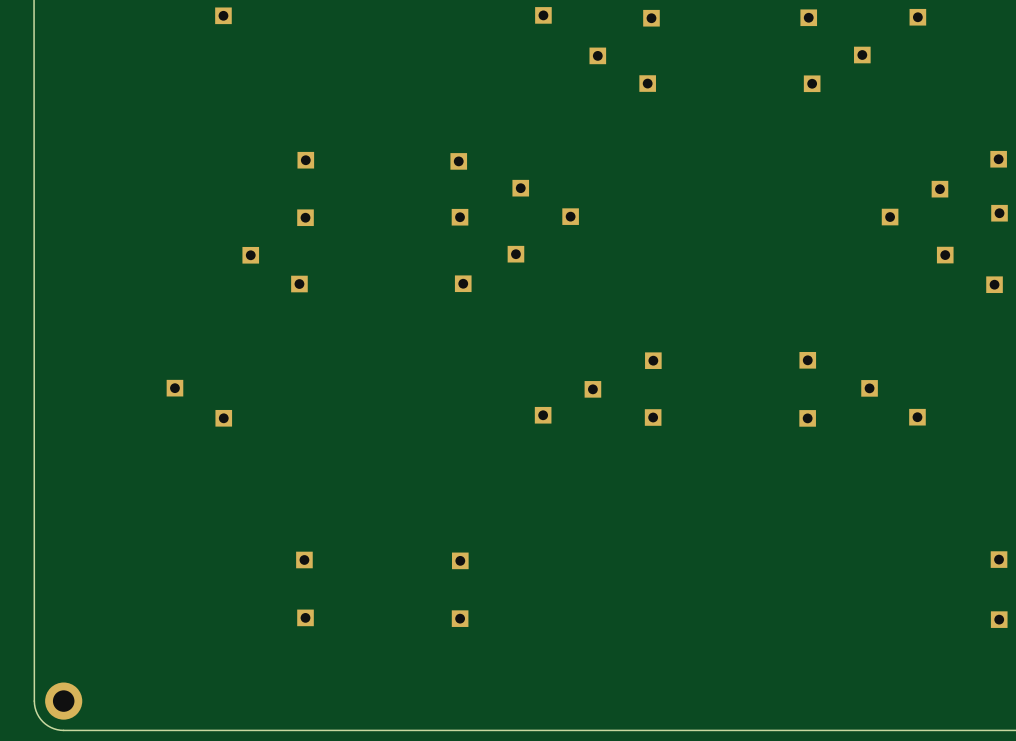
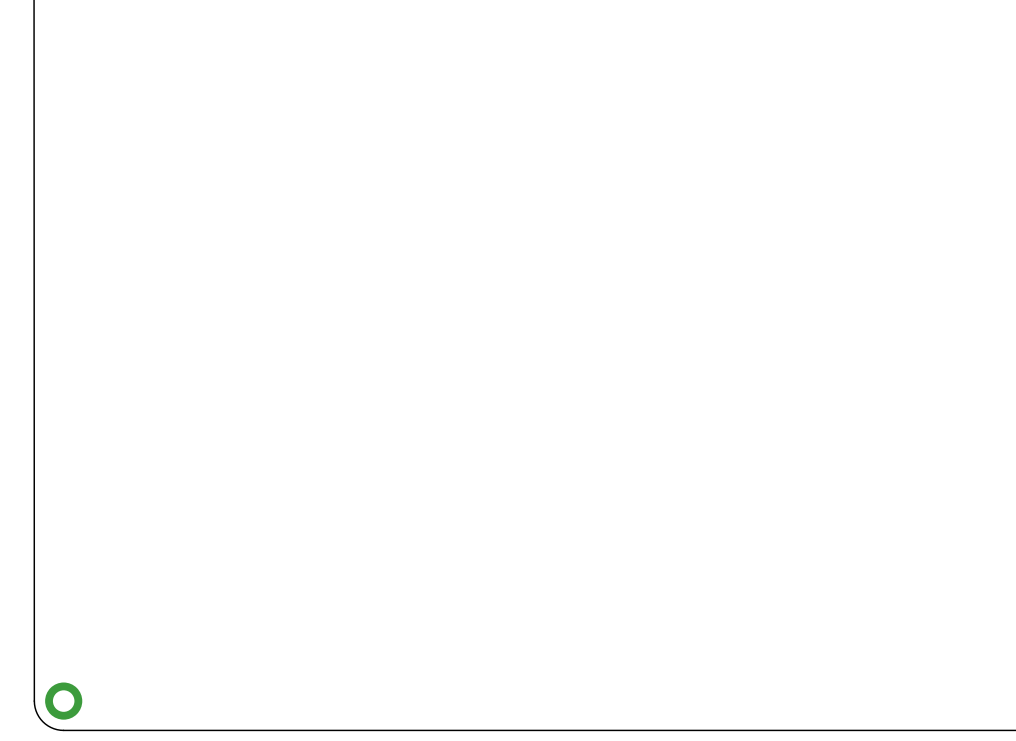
part: (223, 15) -> none
part: (543, 15) -> none
part: (808, 17) -> none
part: (917, 17) -> none
part: (651, 18) -> none
part: (597, 55) -> none
part: (862, 55) -> none
part: (647, 83) -> none
part: (812, 83) -> none
part: (998, 159) -> none
part: (305, 160) -> none
part: (458, 161) -> none
part: (520, 188) -> none
part: (939, 189) -> none
part: (999, 213) -> none
part: (570, 216) -> none
part: (305, 217) -> none
part: (460, 217) -> none
part: (890, 217) -> none
part: (515, 254) -> none
part: (250, 255) -> none
part: (945, 255) -> none
part: (463, 283) -> none
part: (299, 284) -> none
part: (994, 284) -> none
part: (653, 360) -> none
part: (807, 360) -> none
part: (174, 388) -> none
part: (869, 388) -> none
part: (592, 389) -> none
part: (543, 415) -> none
part: (653, 417) -> none
part: (917, 417) -> none
part: (223, 418) -> none
part: (807, 418) -> none
part: (304, 559) -> none
part: (999, 559) -> none
part: (460, 560) -> none
part: (305, 617) -> none
part: (460, 618) -> none
part: (999, 619) -> none

